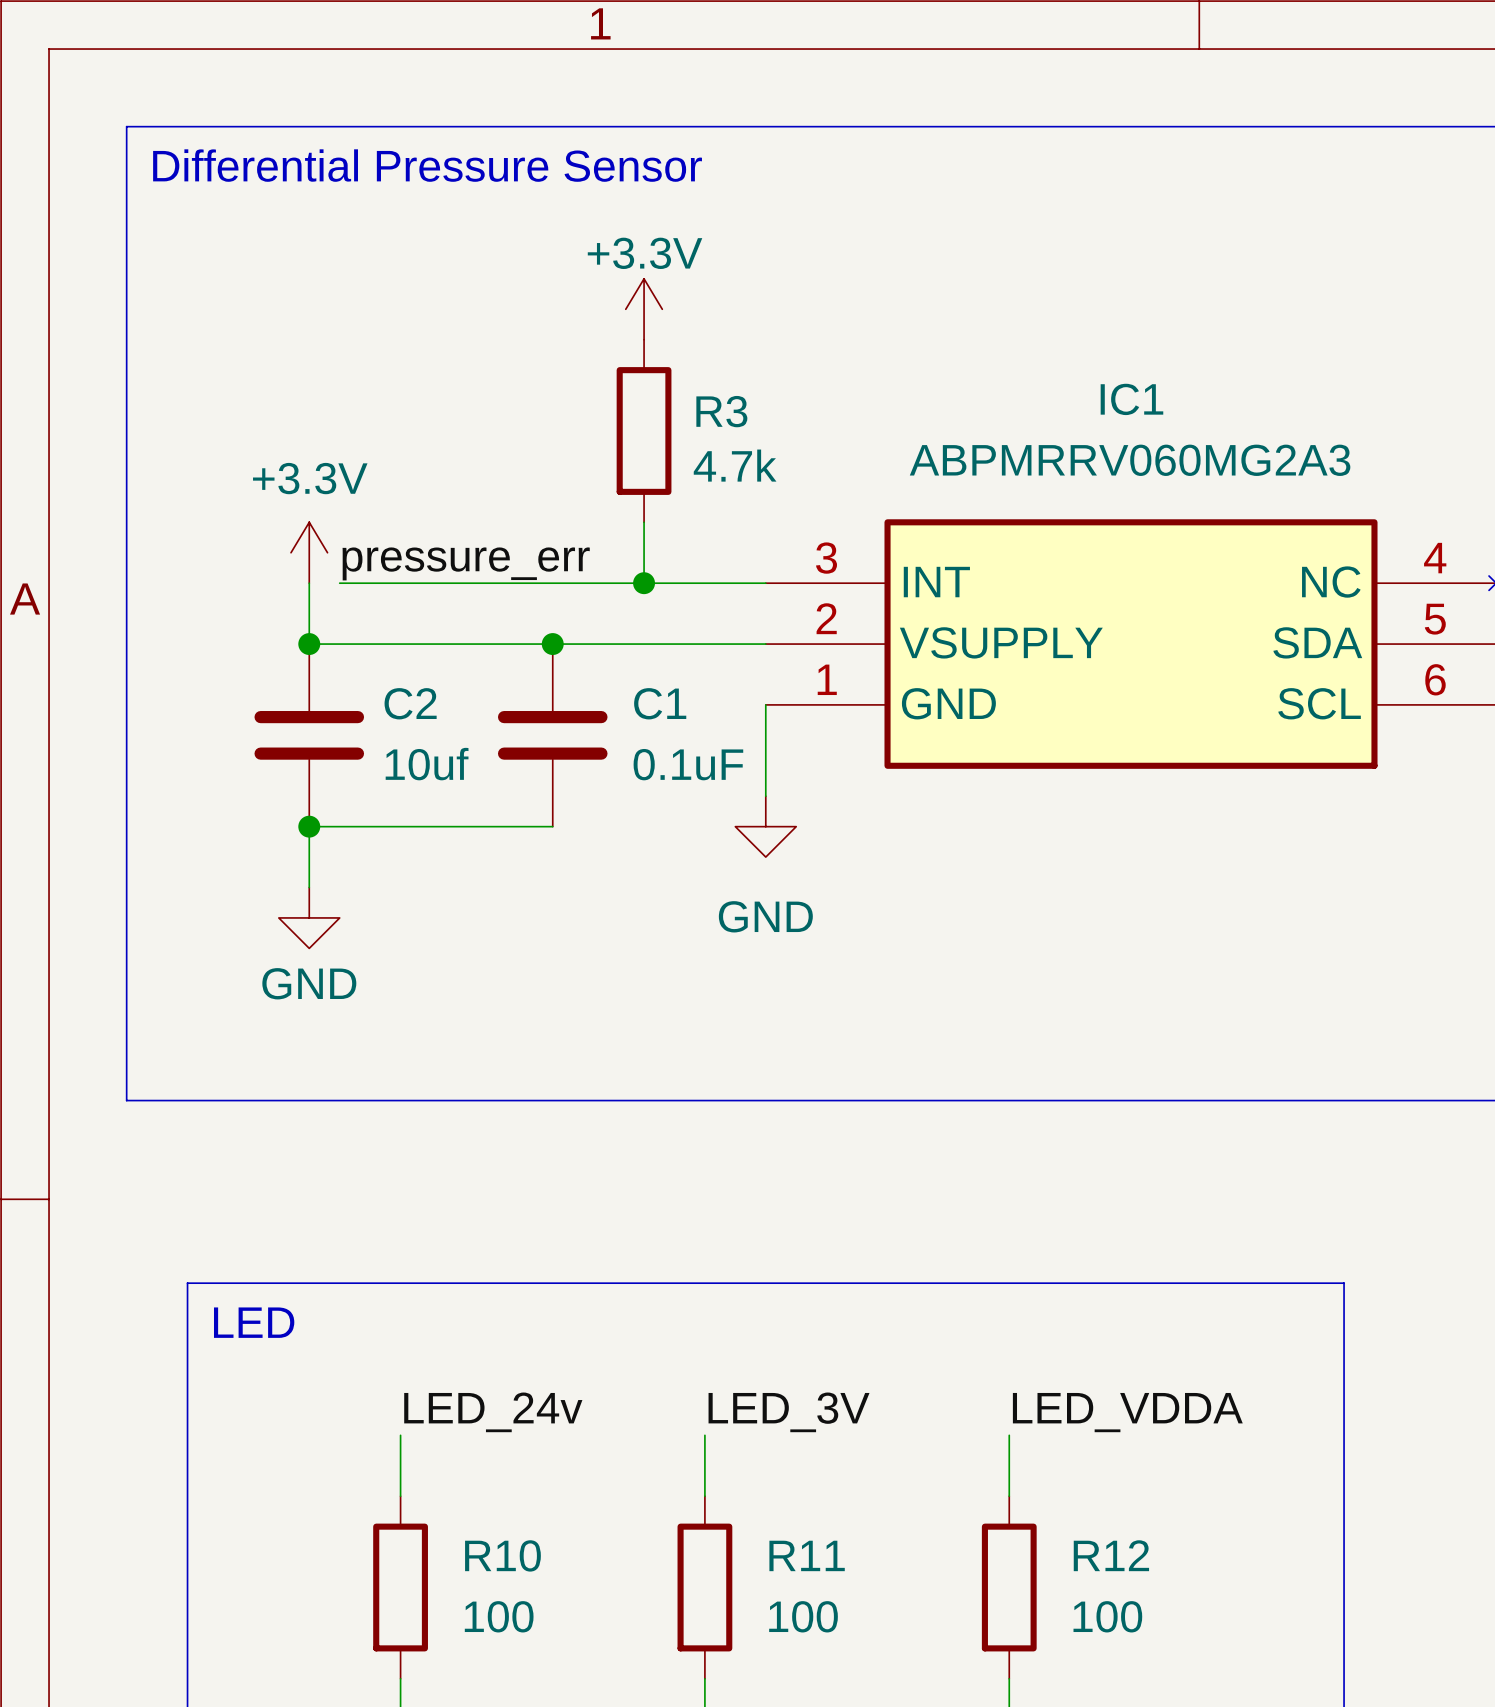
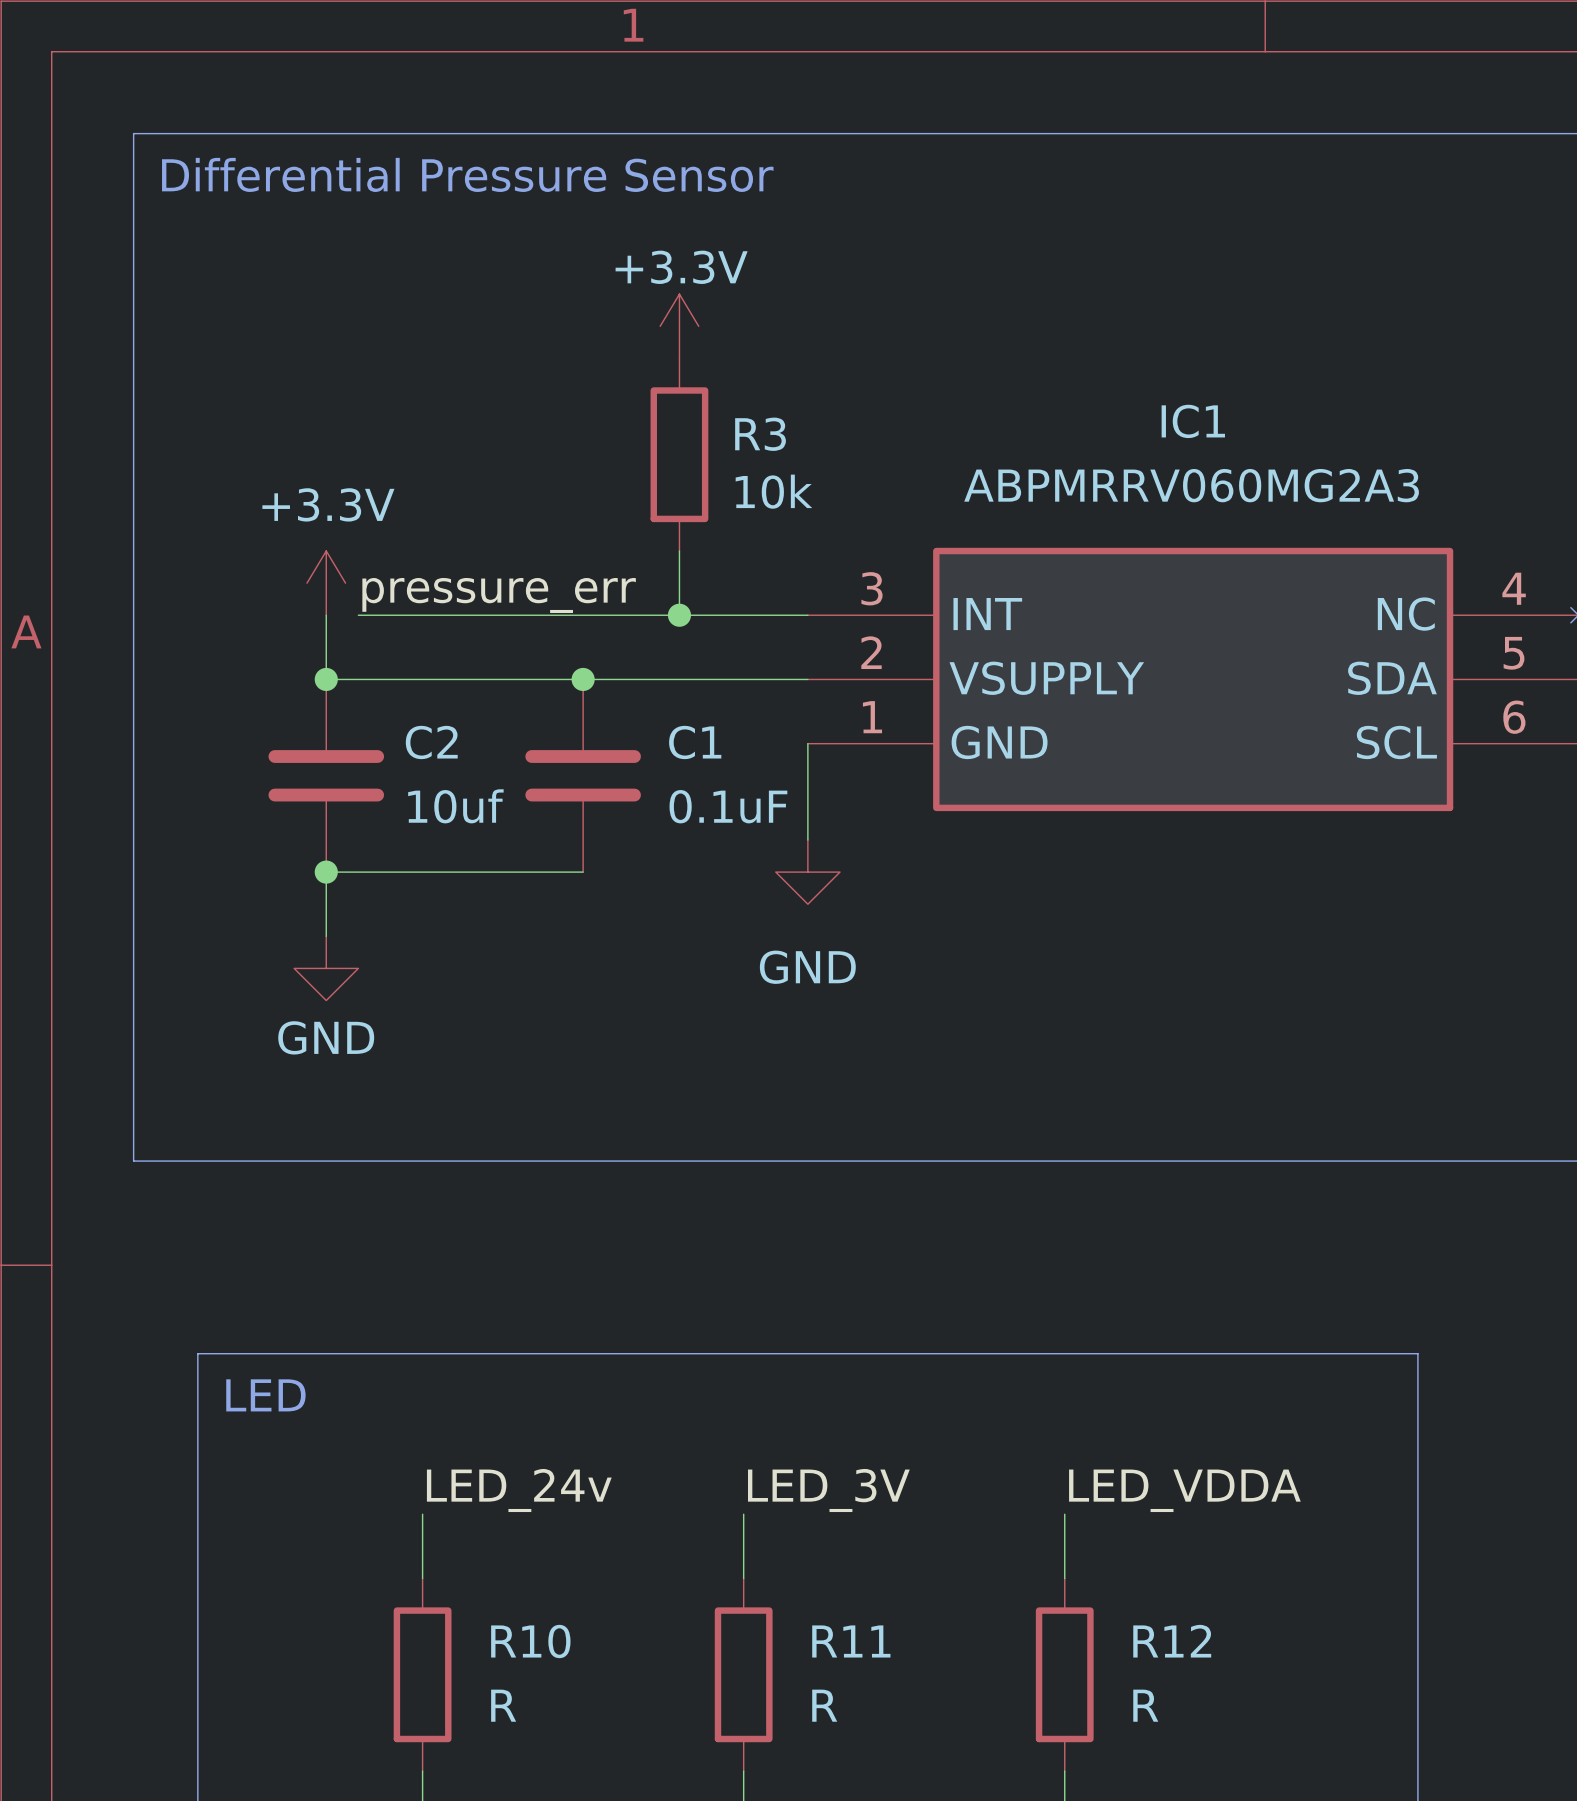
R3 value: 4.7k (735, 465) -> 10k (773, 491)
R10 value: 100 (499, 1616) -> R (503, 1705)
R11 value: 100 (803, 1616) -> R (824, 1705)
R12 value: 100 (1107, 1616) -> R (1145, 1705)

